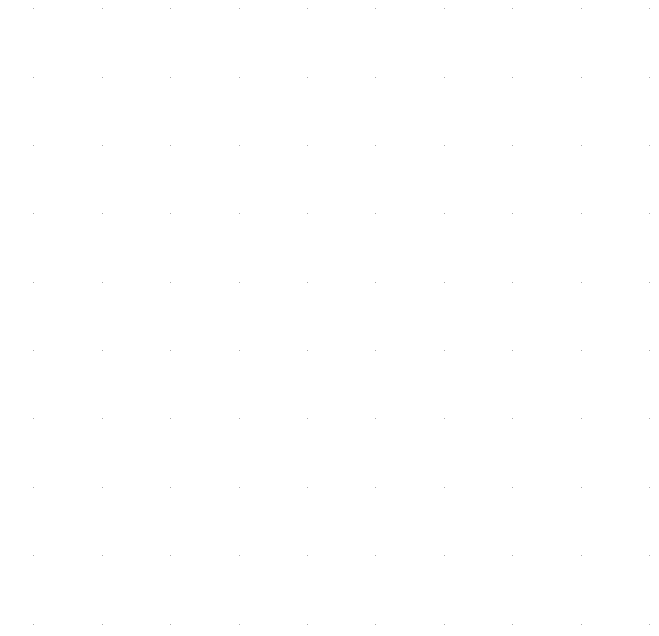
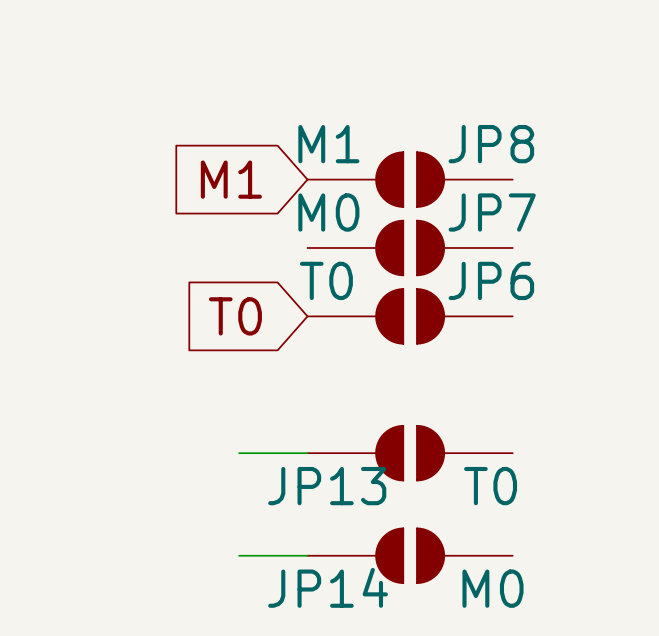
global label: none -> M1 (231, 179)
JP8: none -> M1 (410, 179)
JP7: none -> M0 (410, 247)
global label: none -> T0 (235, 316)
JP6: none -> T0 (410, 316)
wire: none -> (239, 453) (307, 453)
JP13: none -> T0 (410, 453)
wire: none -> (239, 555) (307, 555)
JP14: none -> M0 (410, 555)

